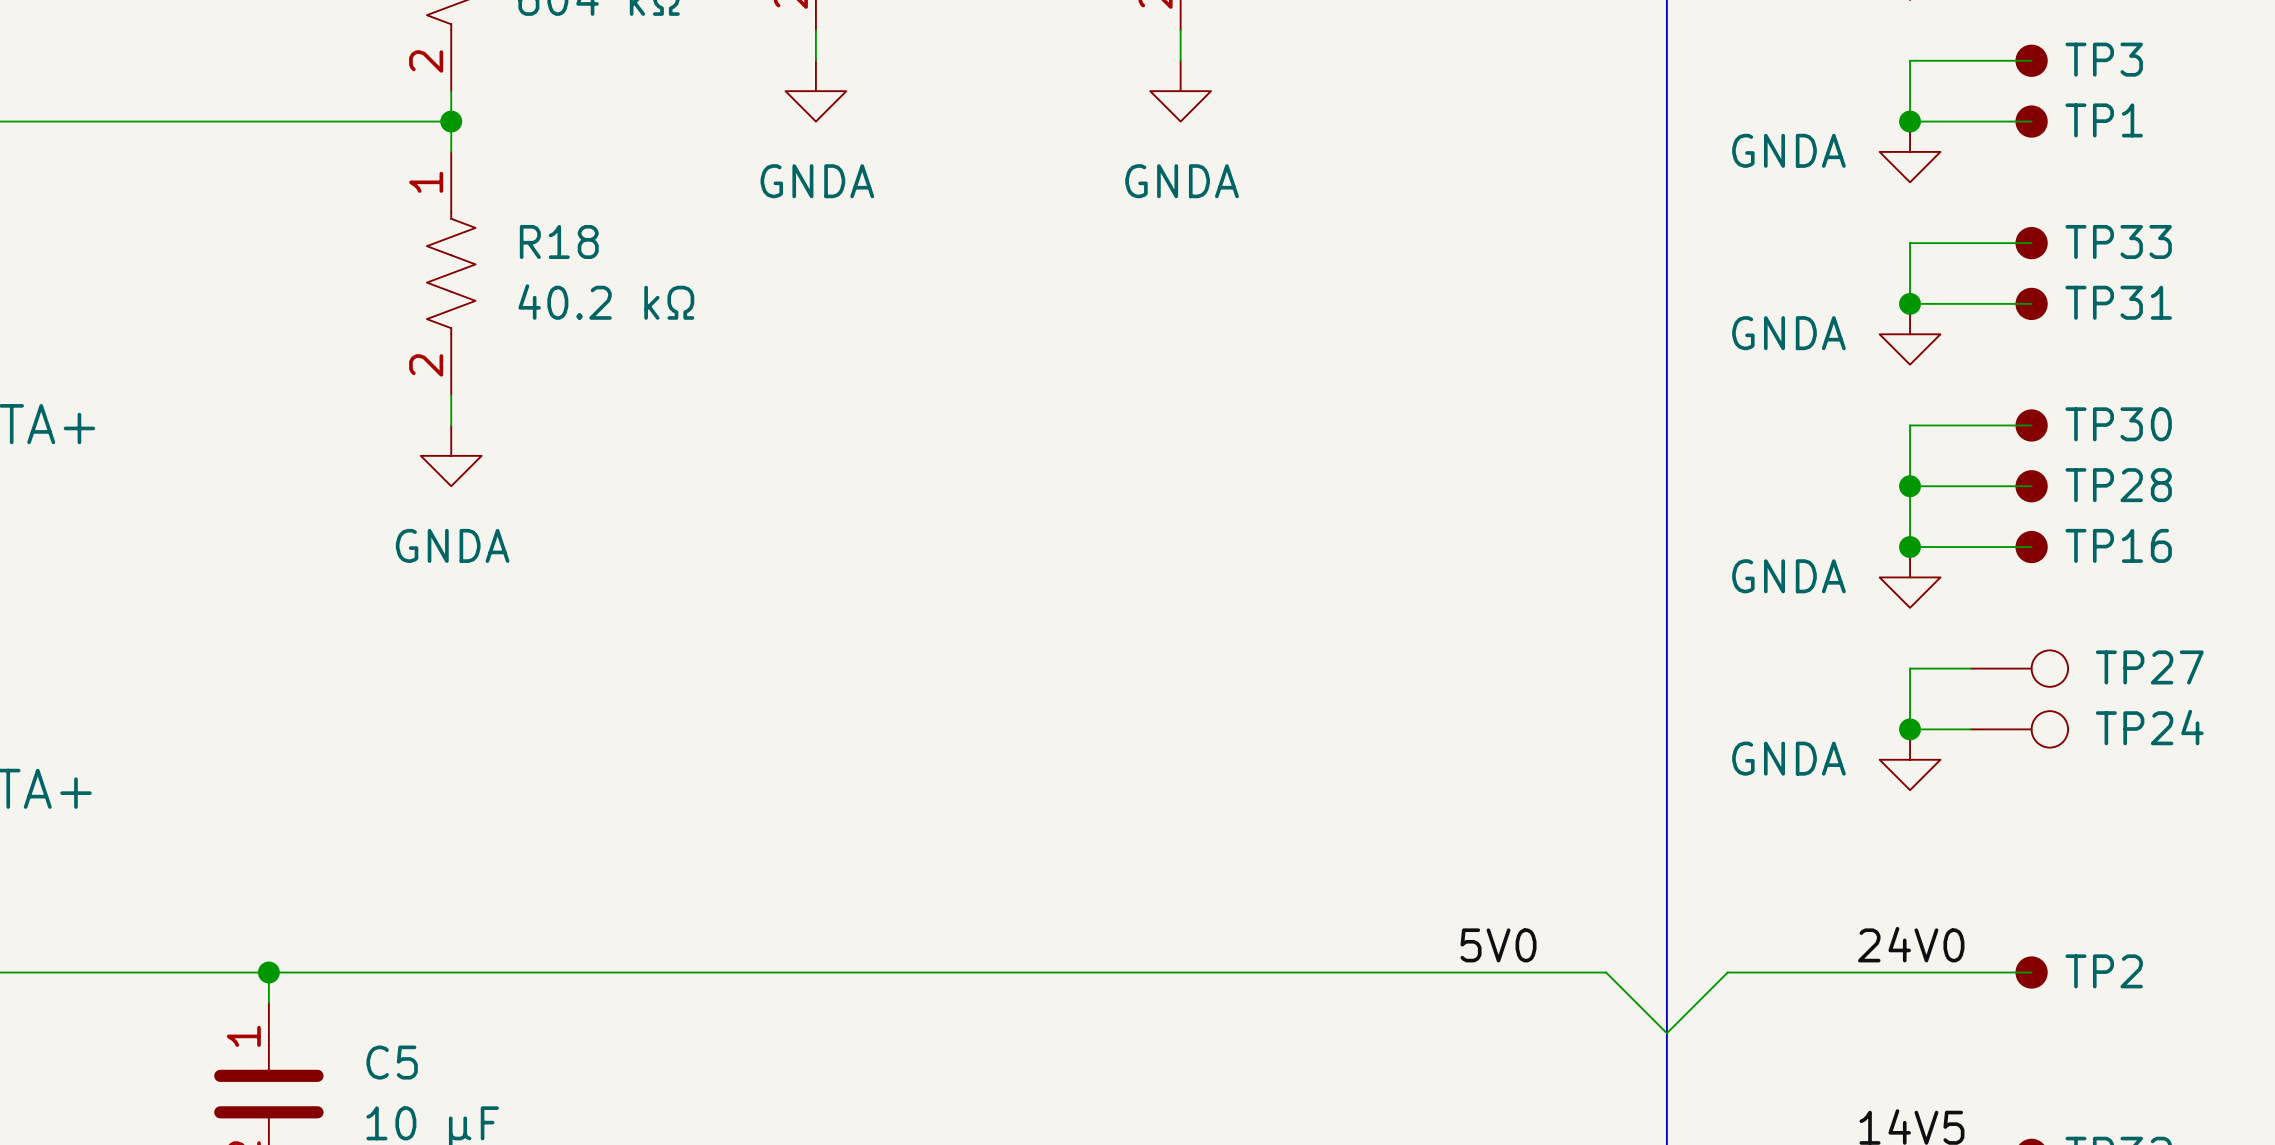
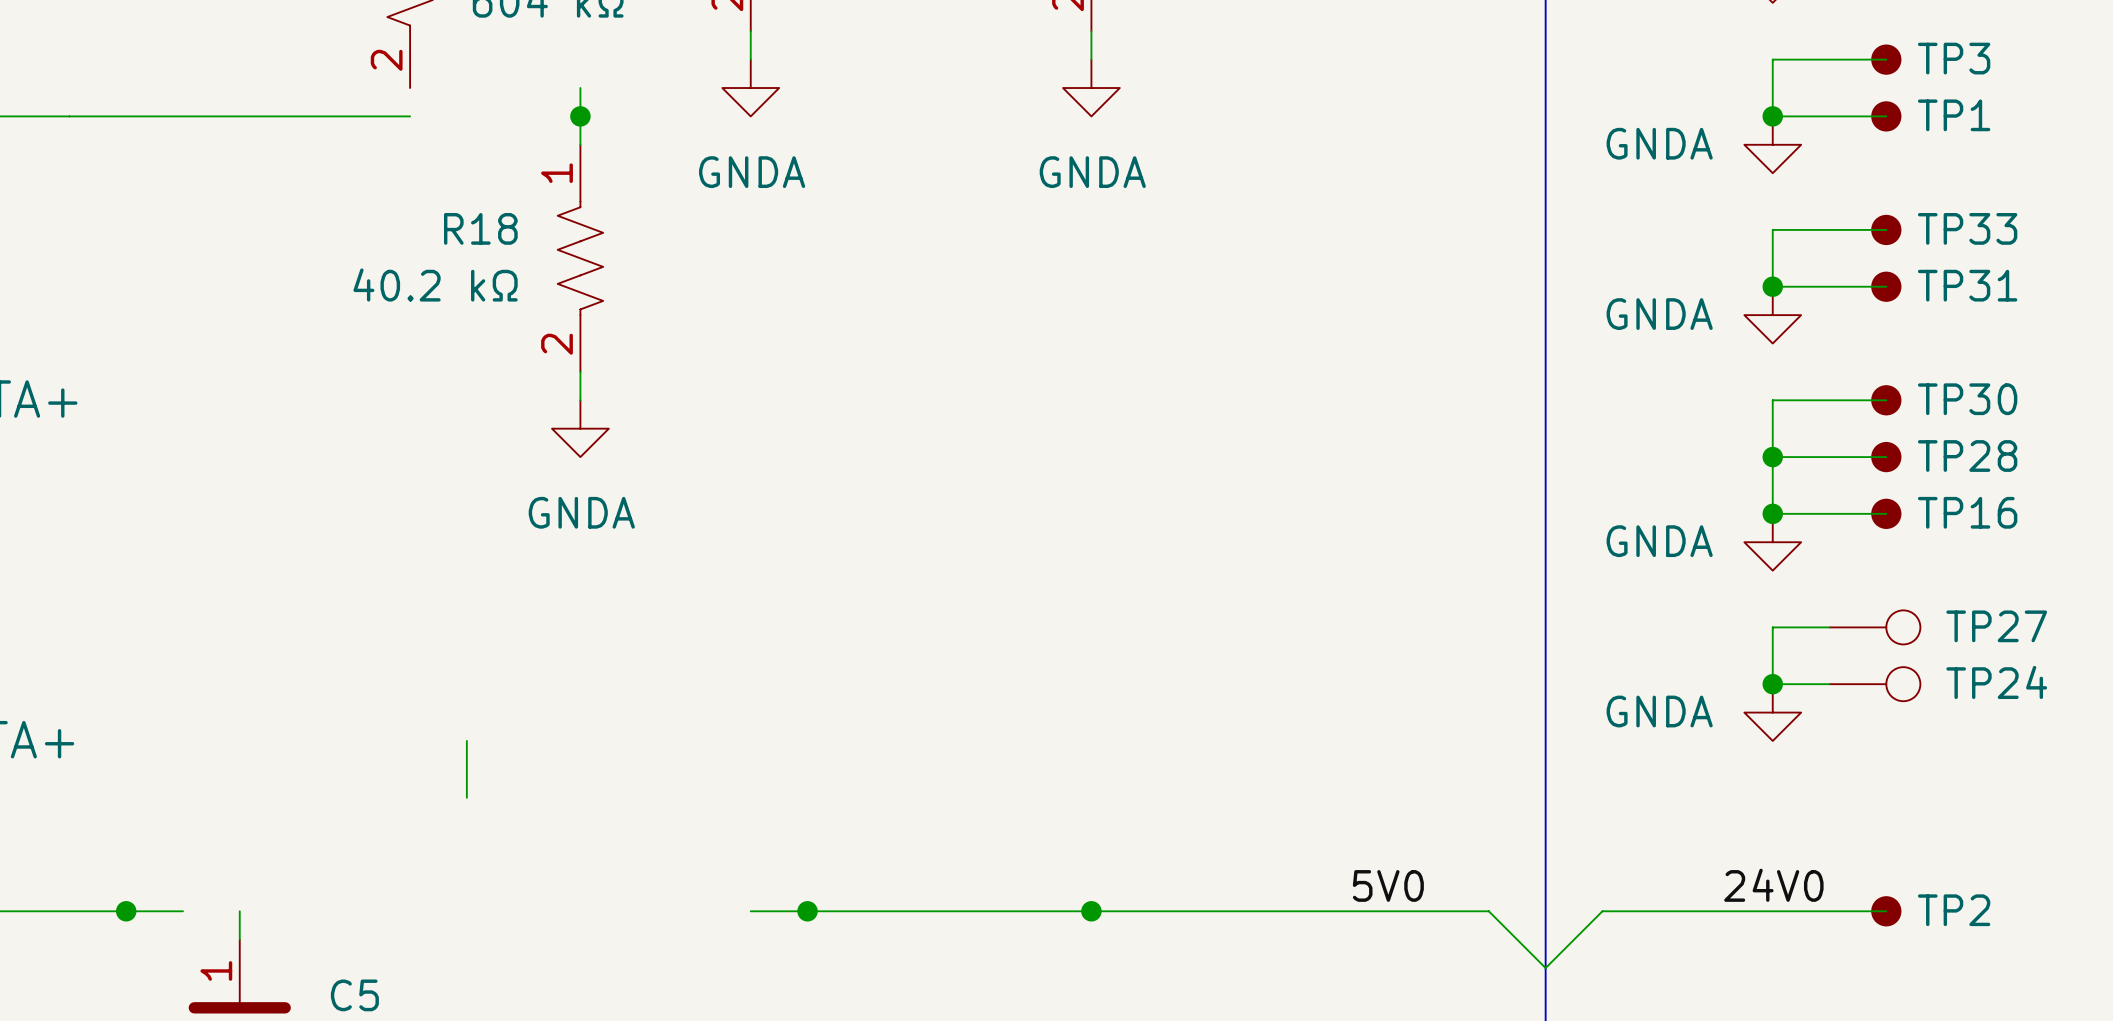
wire: (451, 91) (451, 151) -> (580, 88) (580, 144)
junction: (451, 121) -> none
junction: none -> (580, 116)
R18 flip: as is (451, 273) -> left-right (580, 258)
R18 position: (451, 273) -> (580, 258)
wire: (451, 395) (451, 425) -> (580, 371) (580, 400)
power symbol position: GNDA (451, 455) -> GNDA (580, 428)
wire: none -> (466, 740) (466, 797)
wire: (208, 972) (815, 972) -> none
junction position: (268, 972) -> (126, 911)
junction: none -> (807, 911)
junction: none -> (1091, 911)

